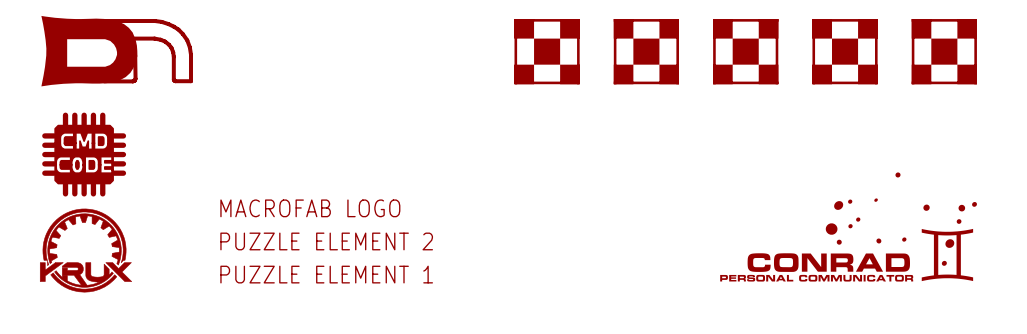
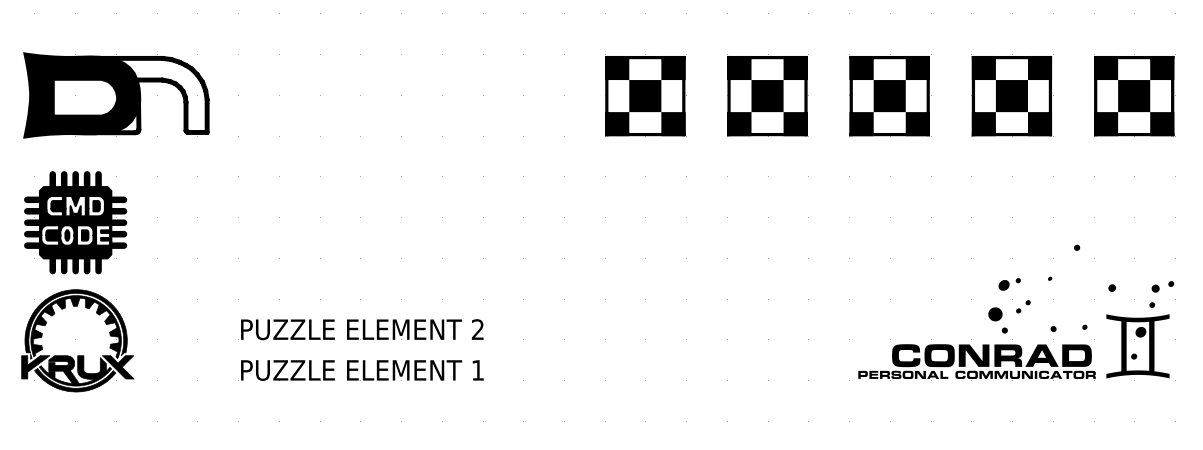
part: (310, 208) -> none

